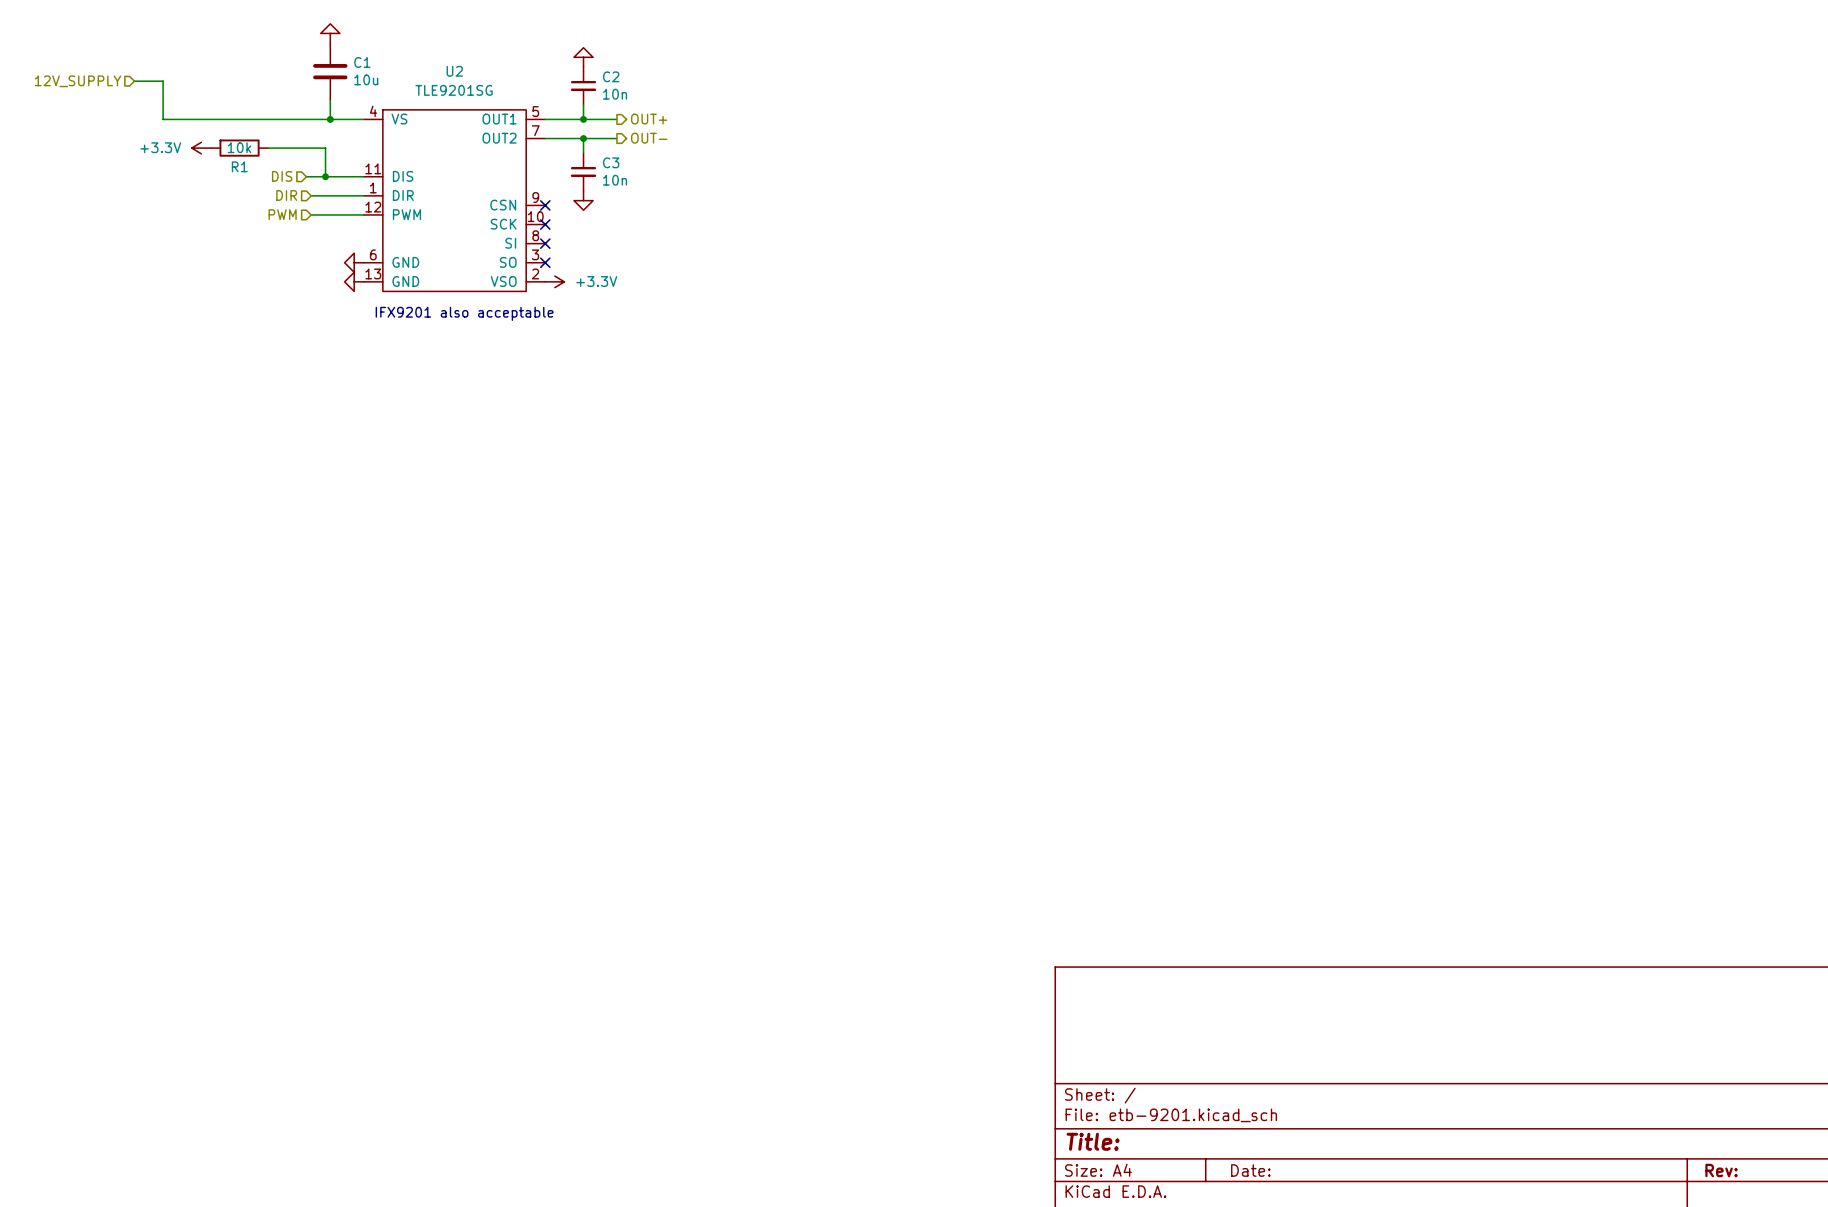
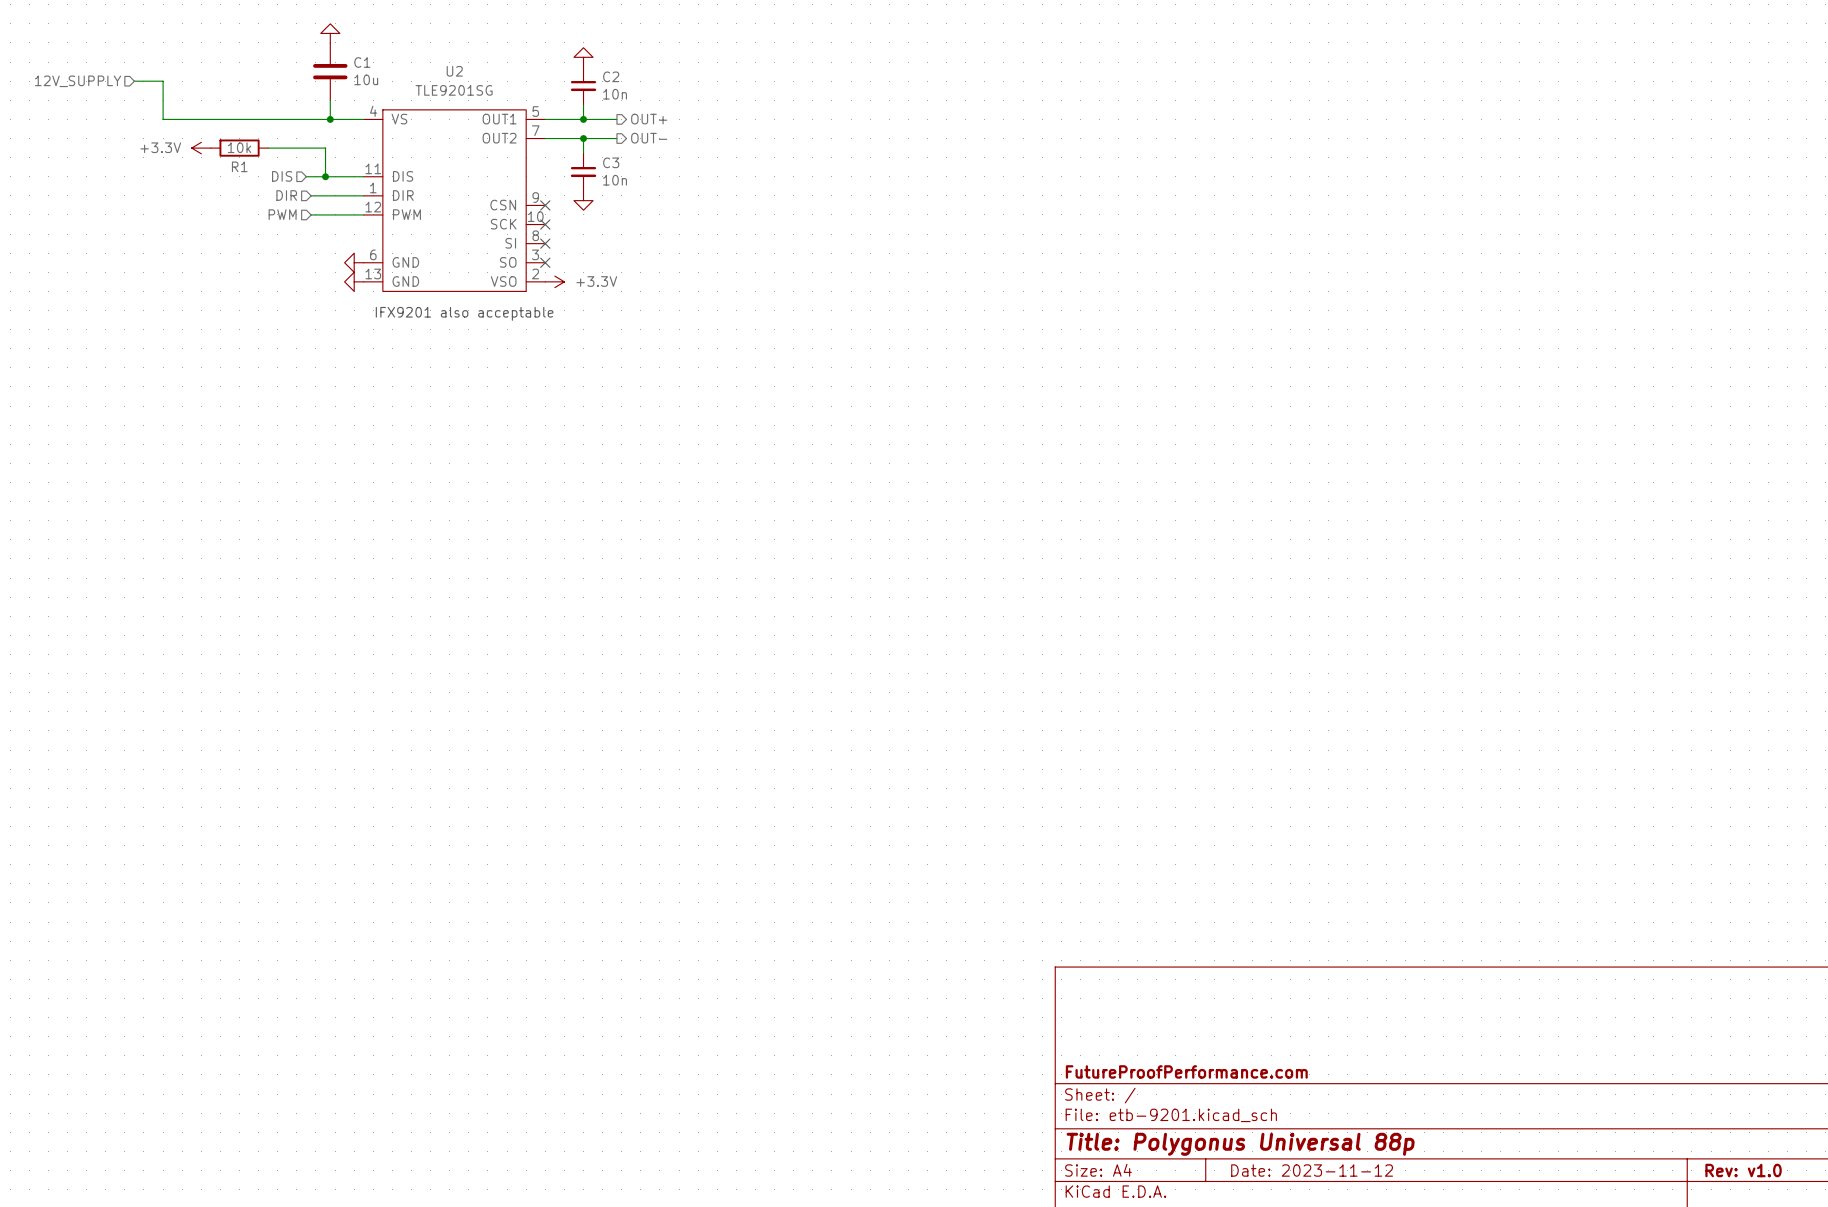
title block: none -> FutureProofPerformance.com (1186, 1071)
title block: Title: (1093, 1141) -> Title: Polygonus Universal 88p (1240, 1144)
title block: Date: (1250, 1170) -> Date: 2023-11-12 (1312, 1170)
title block: Rev: (1721, 1170) -> Rev: v1.0 (1743, 1170)

